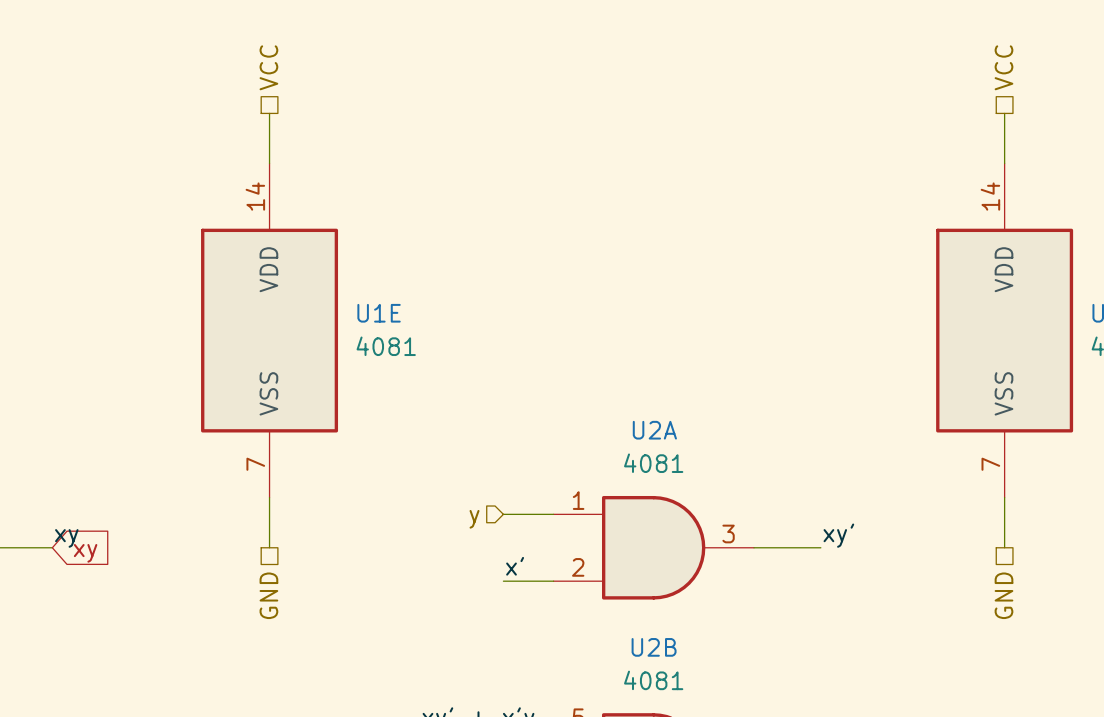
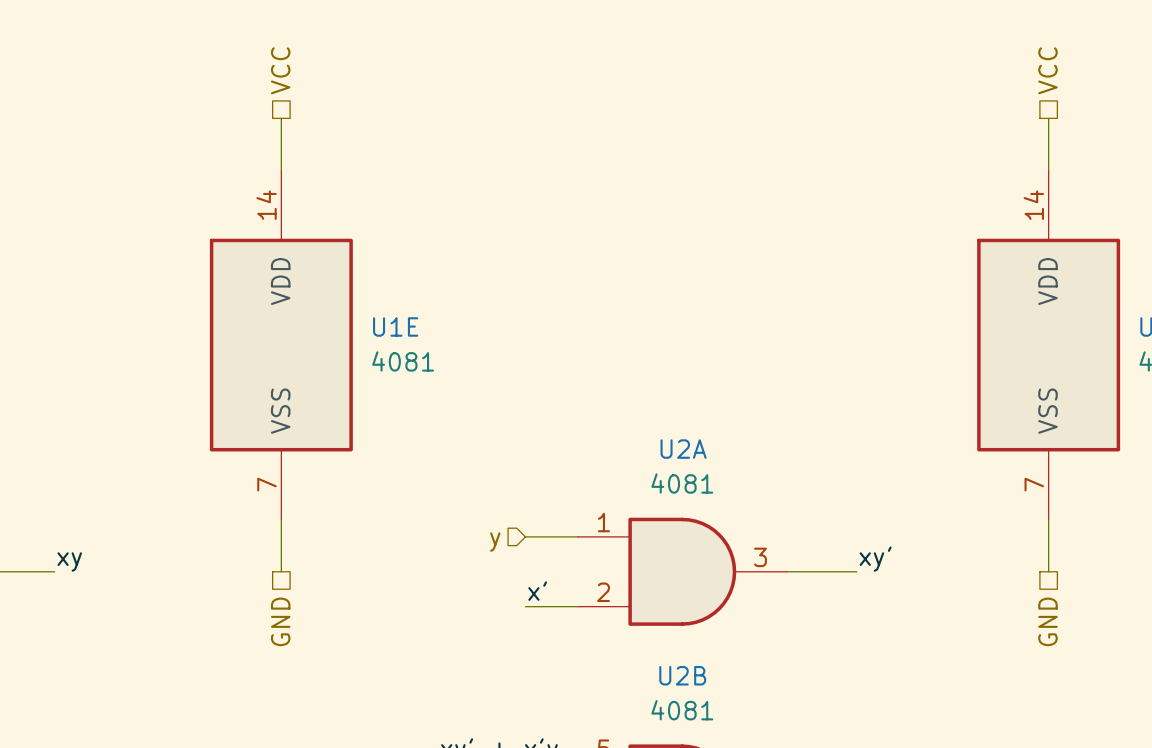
global label: xy (85, 553) -> none

